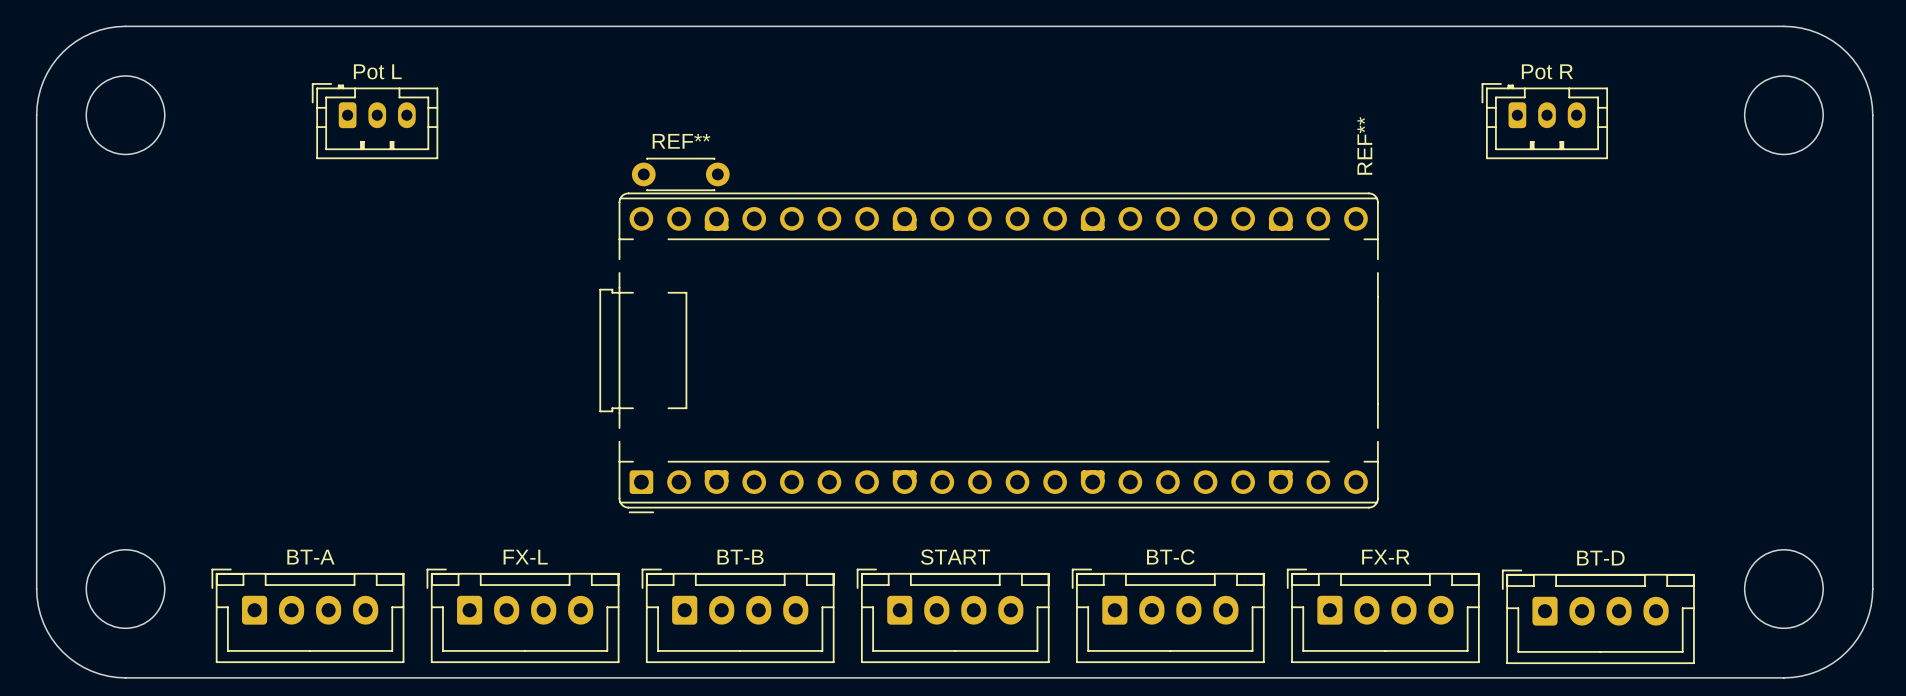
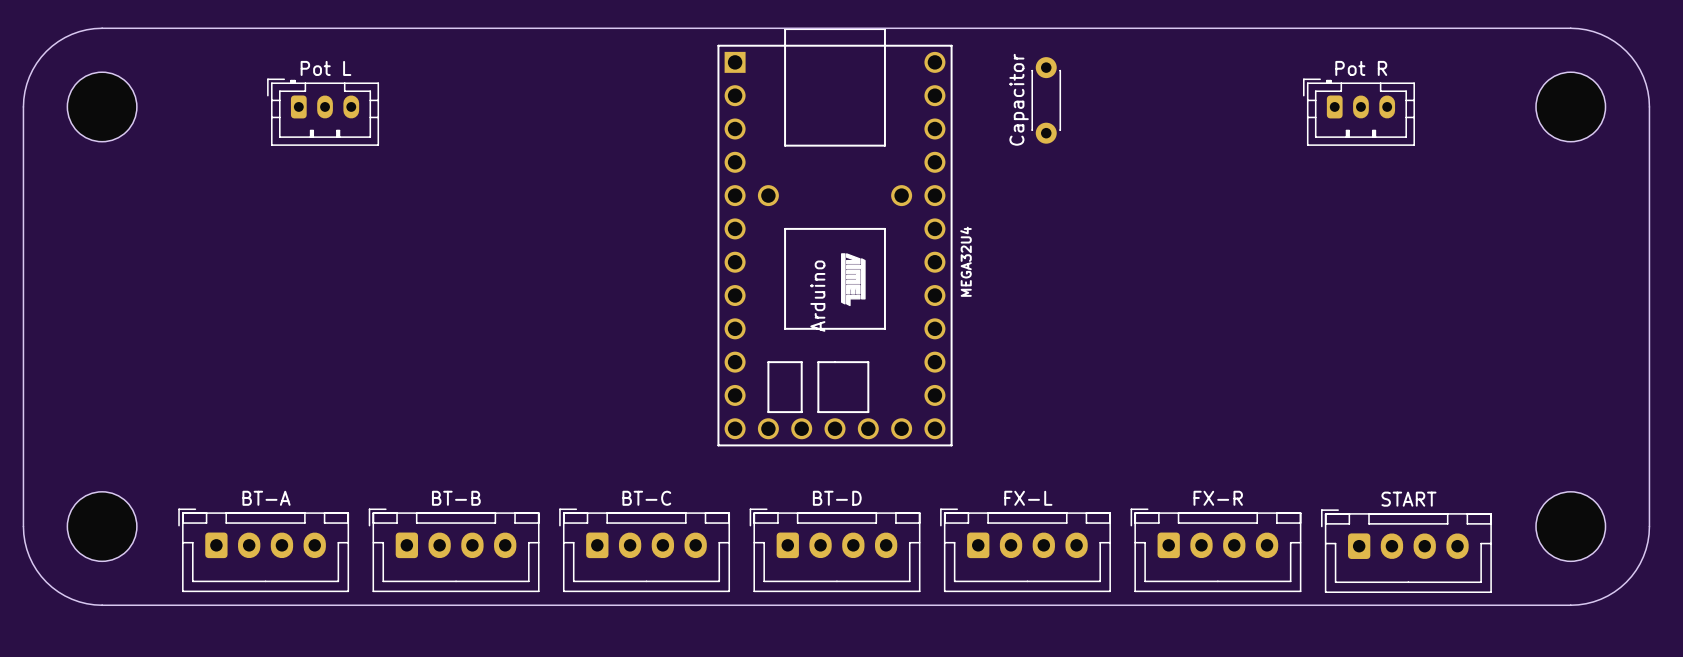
Capacitor: none -> (1046, 100)
REF**: (680, 174) -> none
Arduino: none -> (835, 237)
REF**: (989, 352) -> none
FX-L name: FX-L (525, 557) -> BT-B (456, 498)
BT-B name: BT-B (740, 557) -> BT-C (646, 498)
START name: START (955, 557) -> BT-D (837, 498)
BT-C name: BT-C (1170, 557) -> FX-L (1028, 498)
BT-D name: BT-D (1600, 558) -> START (1408, 499)

